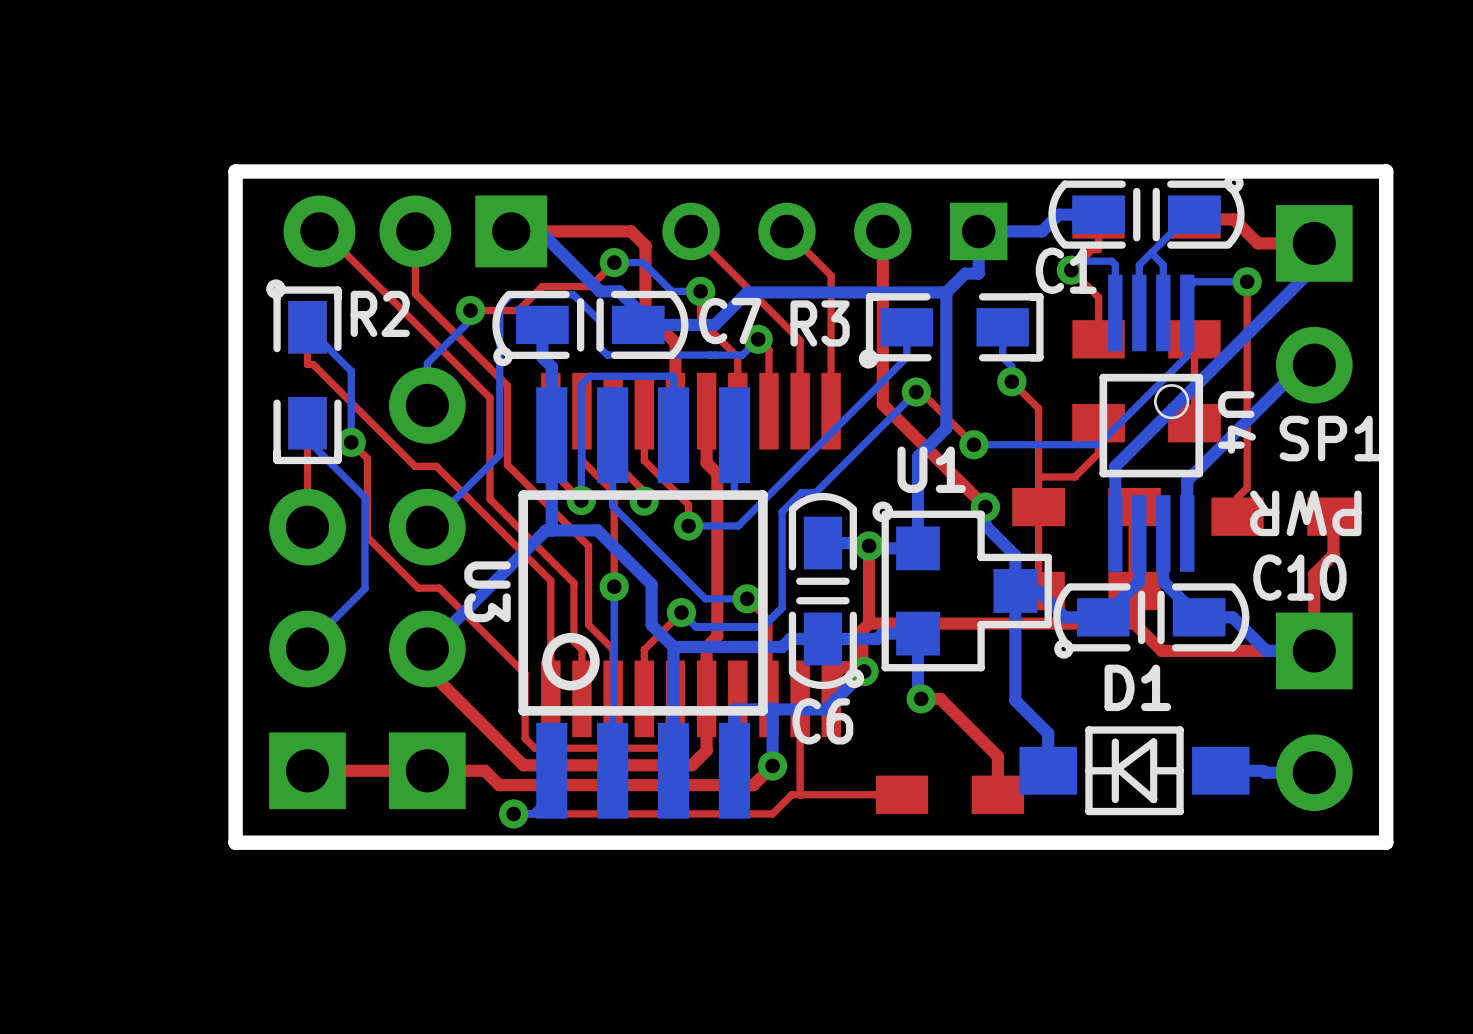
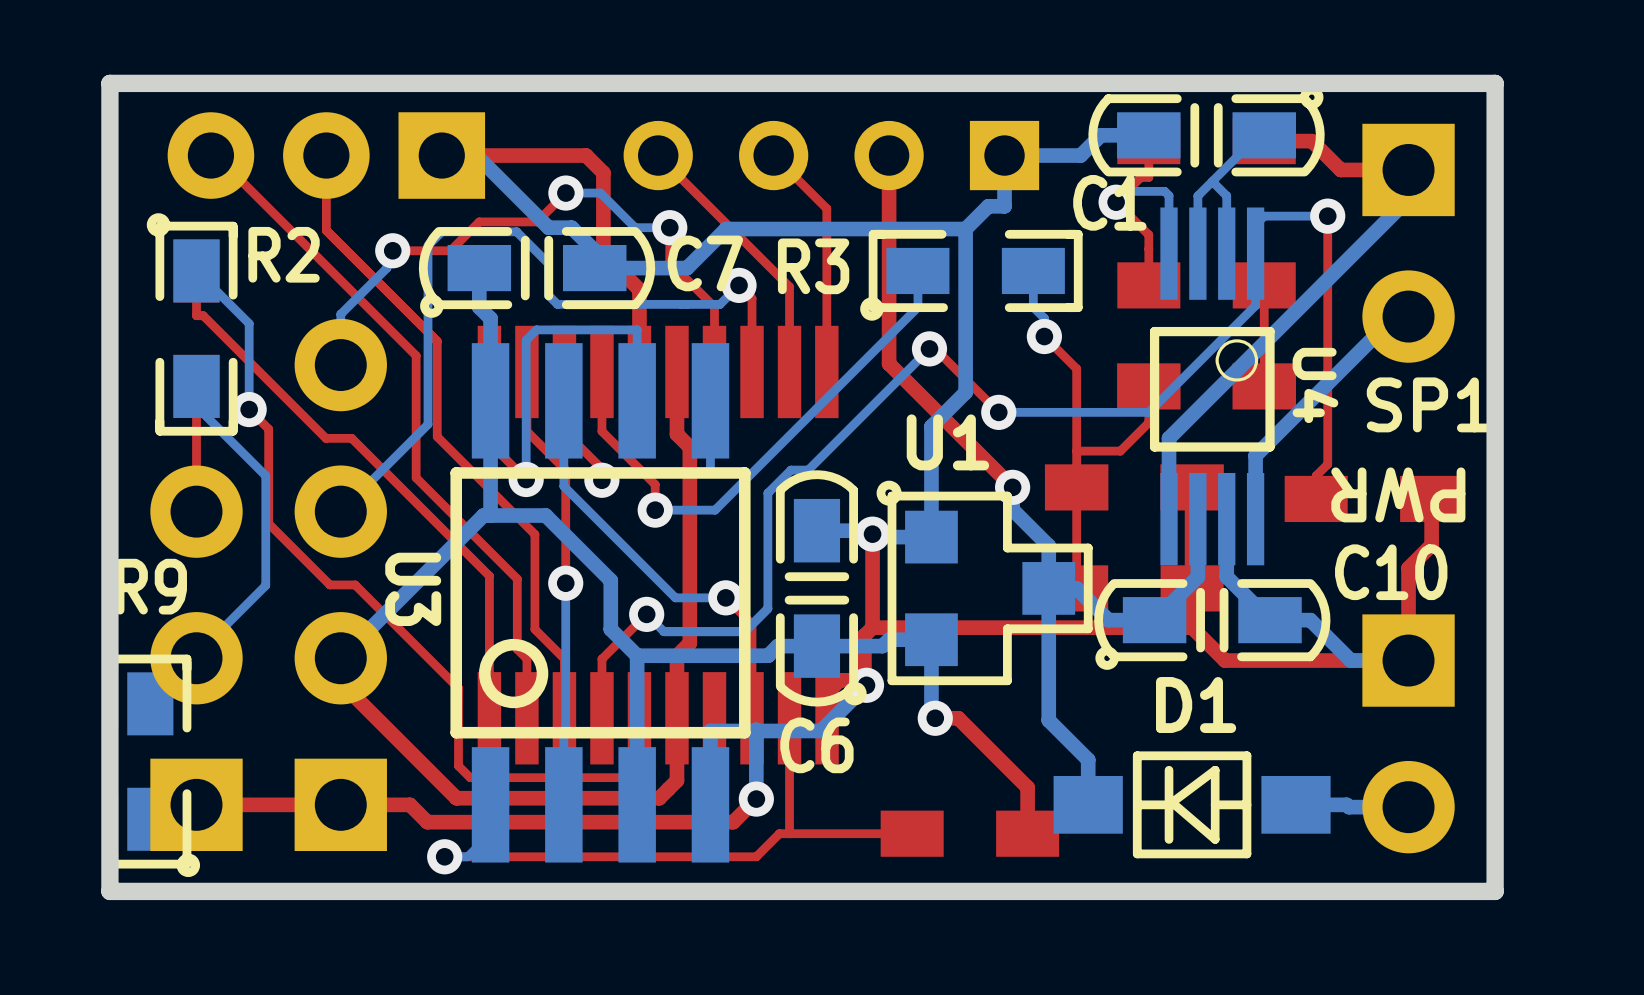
R9: none -> (154, 765)

